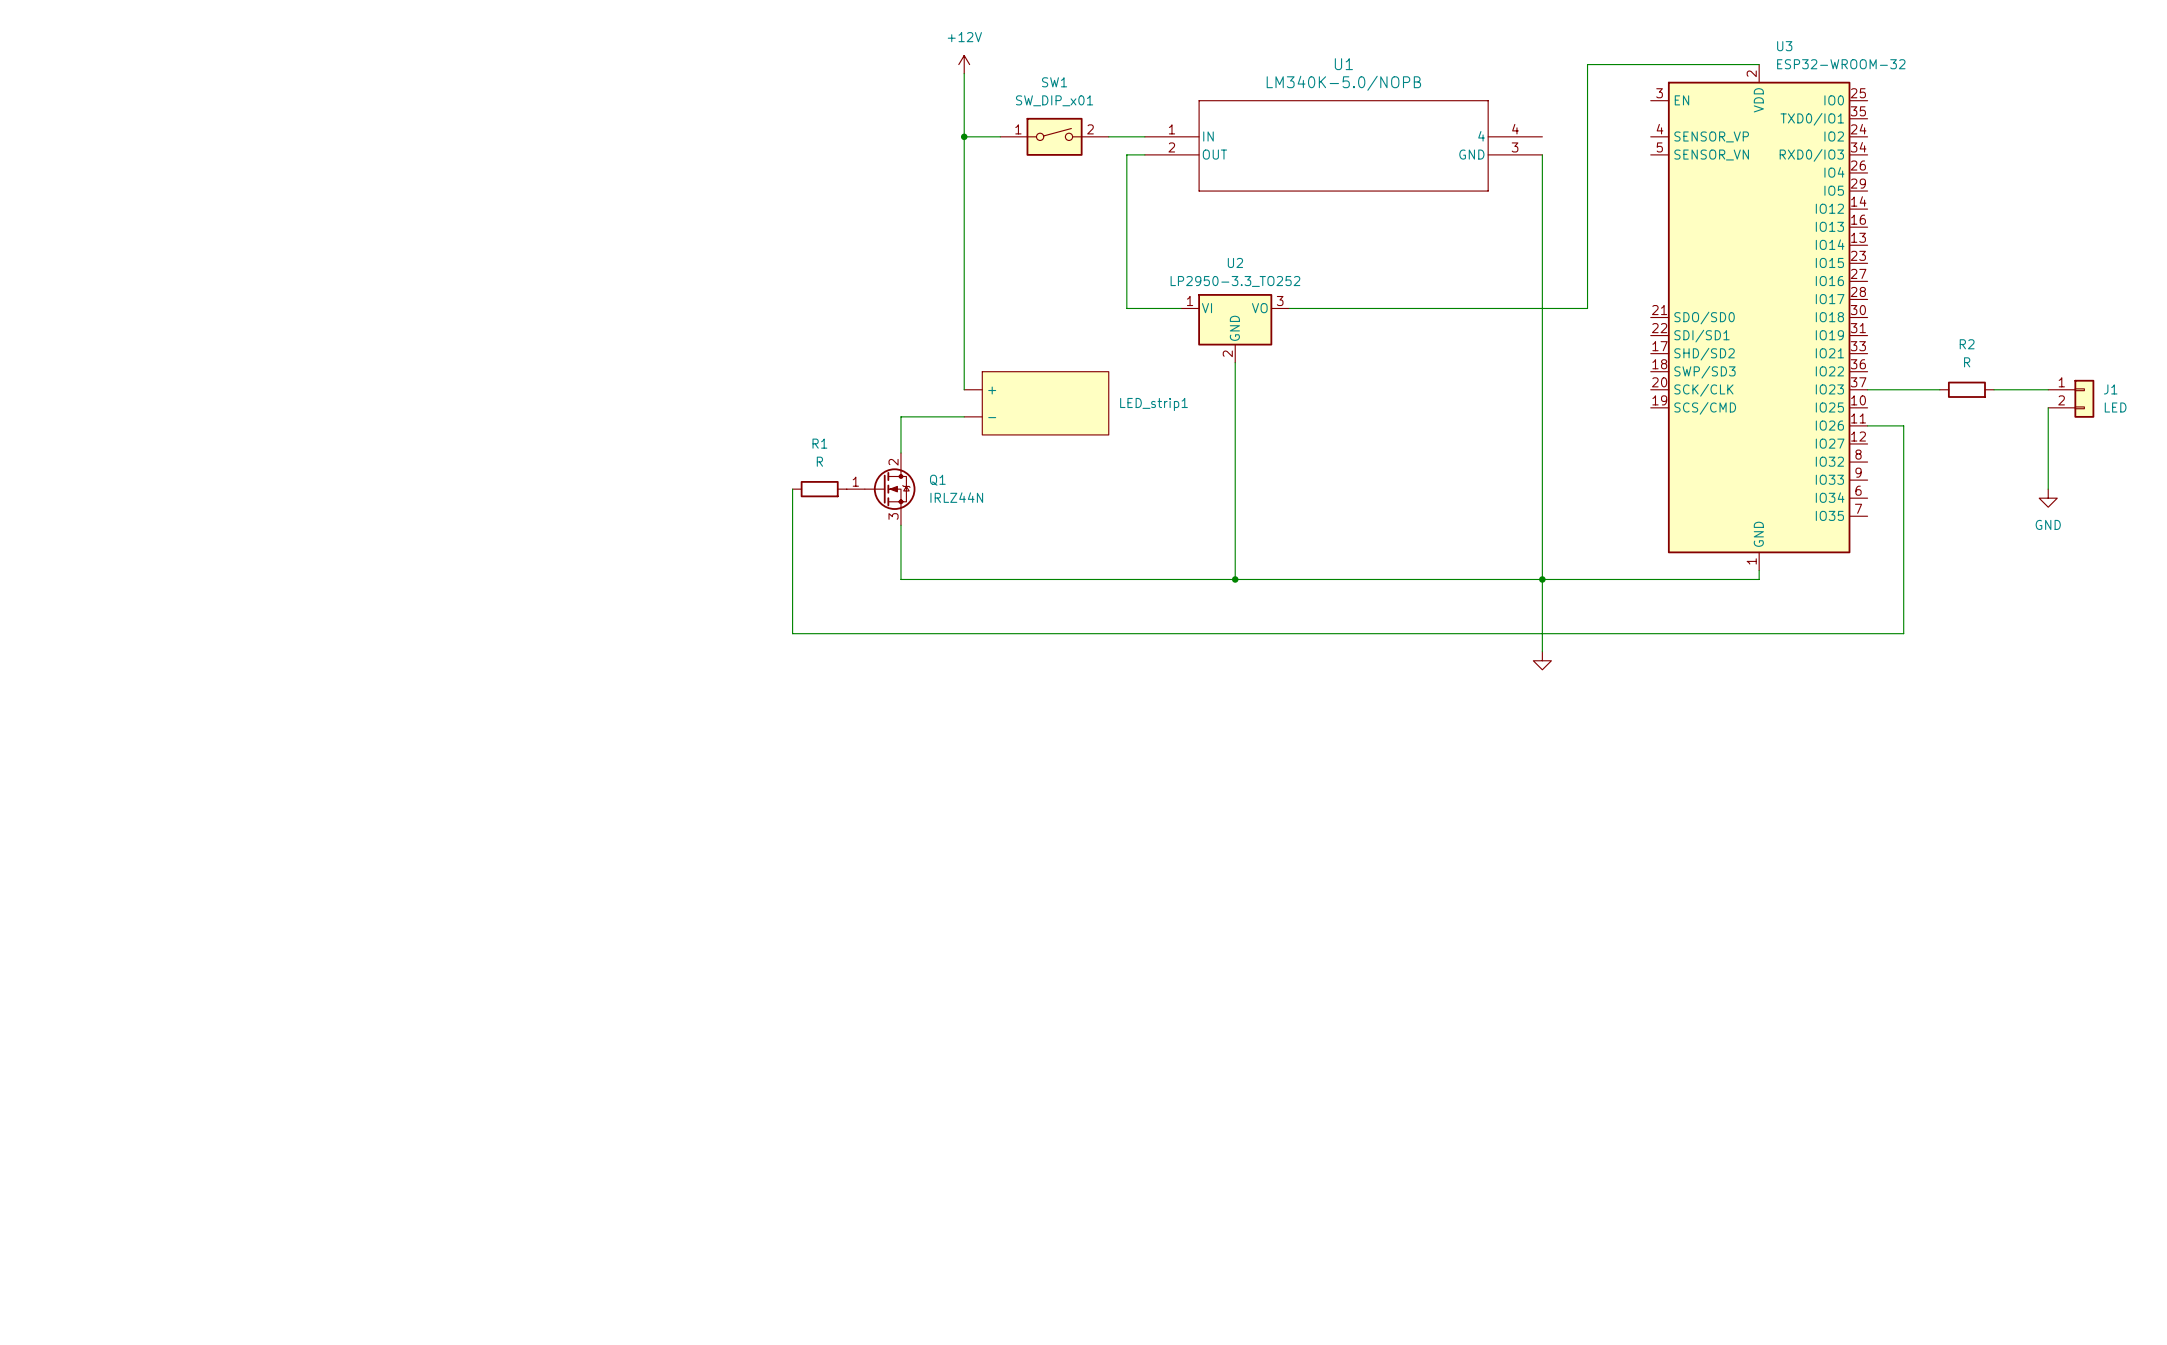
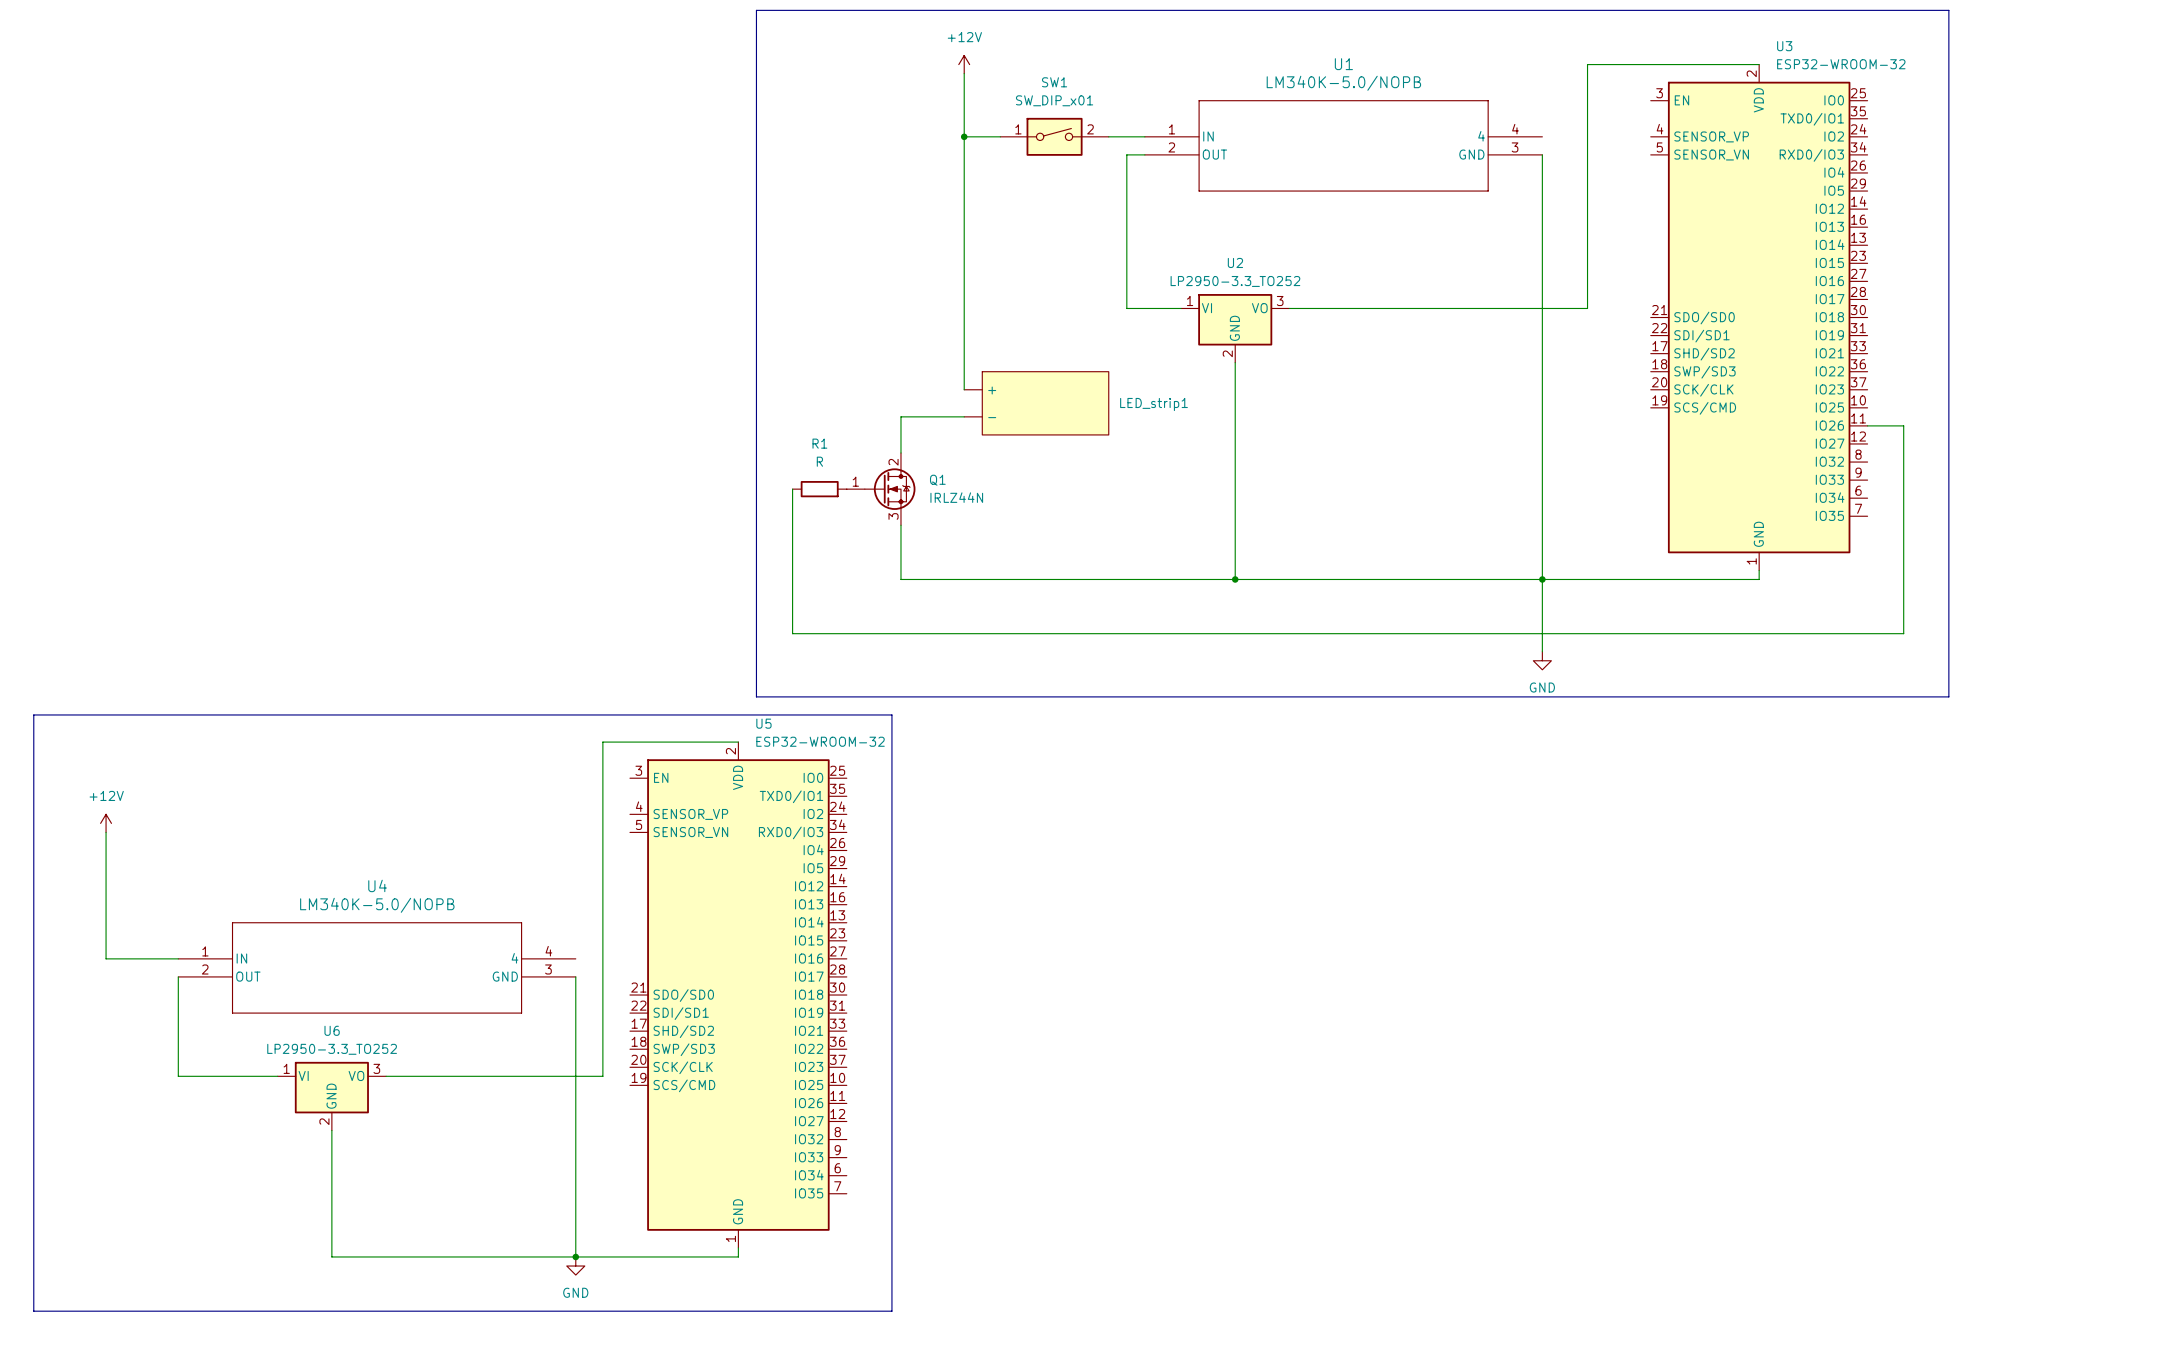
line: none -> (756, 10) (1948, 10) (1948, 696) (756, 696) (756, 10)
wire: (1867, 389) (1939, 389) -> none
R2: R (1966, 389) -> none
wire: (1994, 389) (2048, 389) -> none
J1: LED (2071, 398) -> none
wire: (2048, 407) (2048, 489) -> none
power symbol: GND (2048, 498) -> none
power symbol text: none -> GND (1542, 687)
line: none -> (33, 714) (891, 714) (891, 1311) (33, 1311) (33, 714)
wire: none -> (738, 742) (602, 742) (602, 1076) (386, 1076)
power symbol: none -> +12V (106, 823)
wire: none -> (106, 832) (106, 958) (178, 958)
U4: none -> LM340K-5.0/NOPB (377, 967)
wire: none -> (178, 976) (178, 1076) (277, 1076)
wire: none -> (575, 976) (575, 1256)
U5: none -> ESP32-WROOM-32 (738, 995)
U6: none -> LP2950-3.3_TO252 (331, 1096)
wire: none -> (331, 1130) (331, 1256) (738, 1256) (738, 1247)
junction: none -> (575, 1256)
power symbol: none -> GND (575, 1266)

